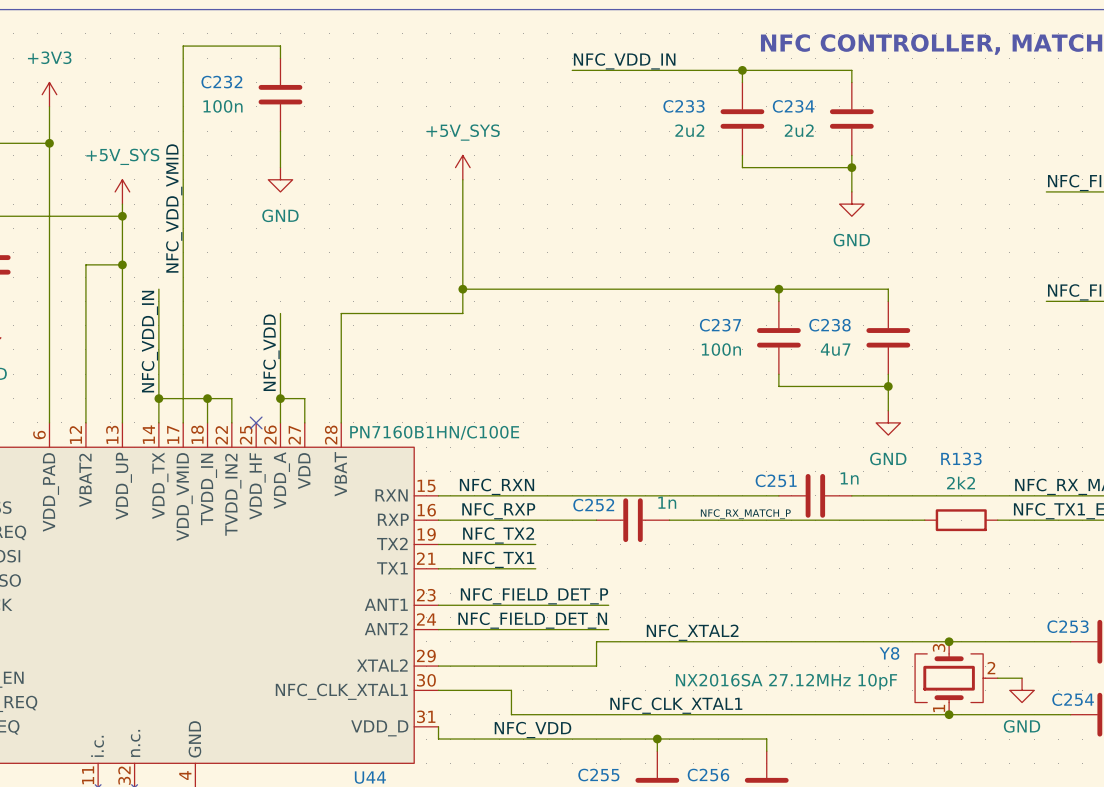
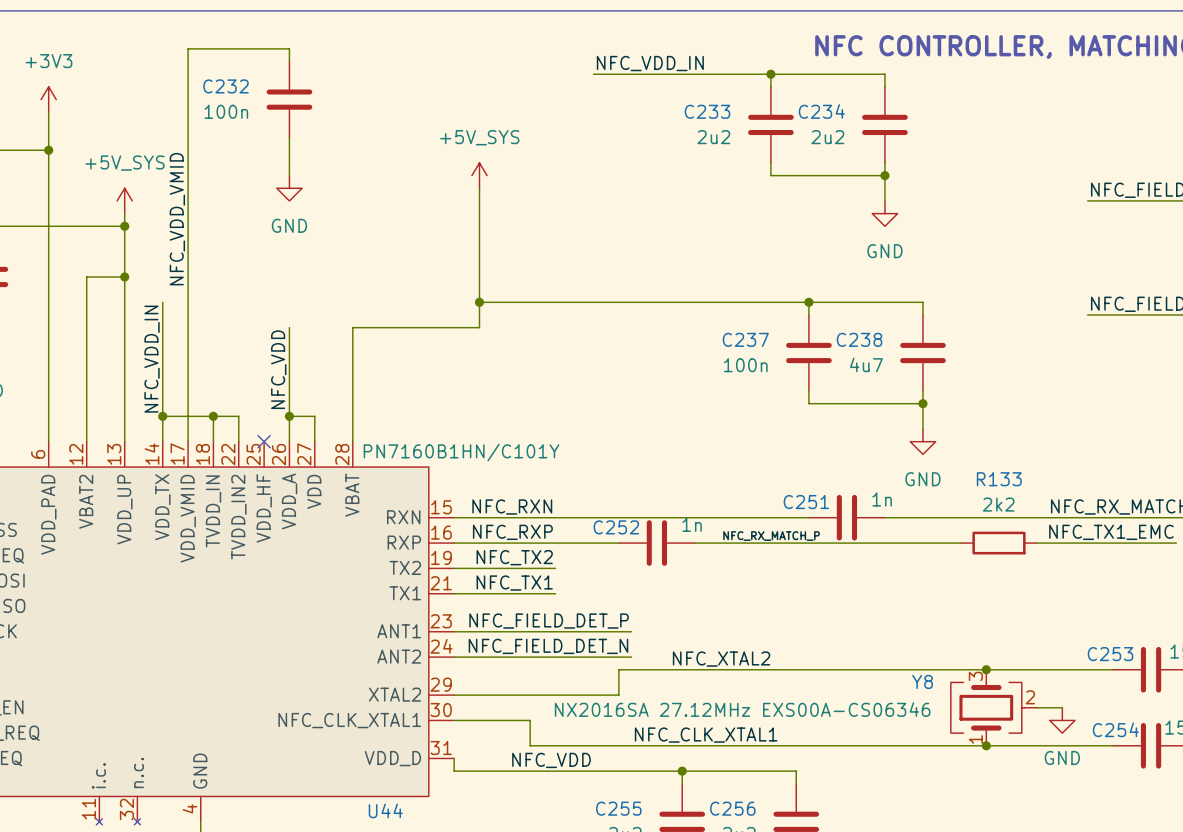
U44 value: PN7160B1HN/C100E (434, 432) -> PN7160B1HN/C101Y (461, 452)
Y8 value: NX2016SA 27.12MHz 10pF (786, 681) -> NX2016SA 27.12MHz EXS00A-CS06346 (742, 709)

